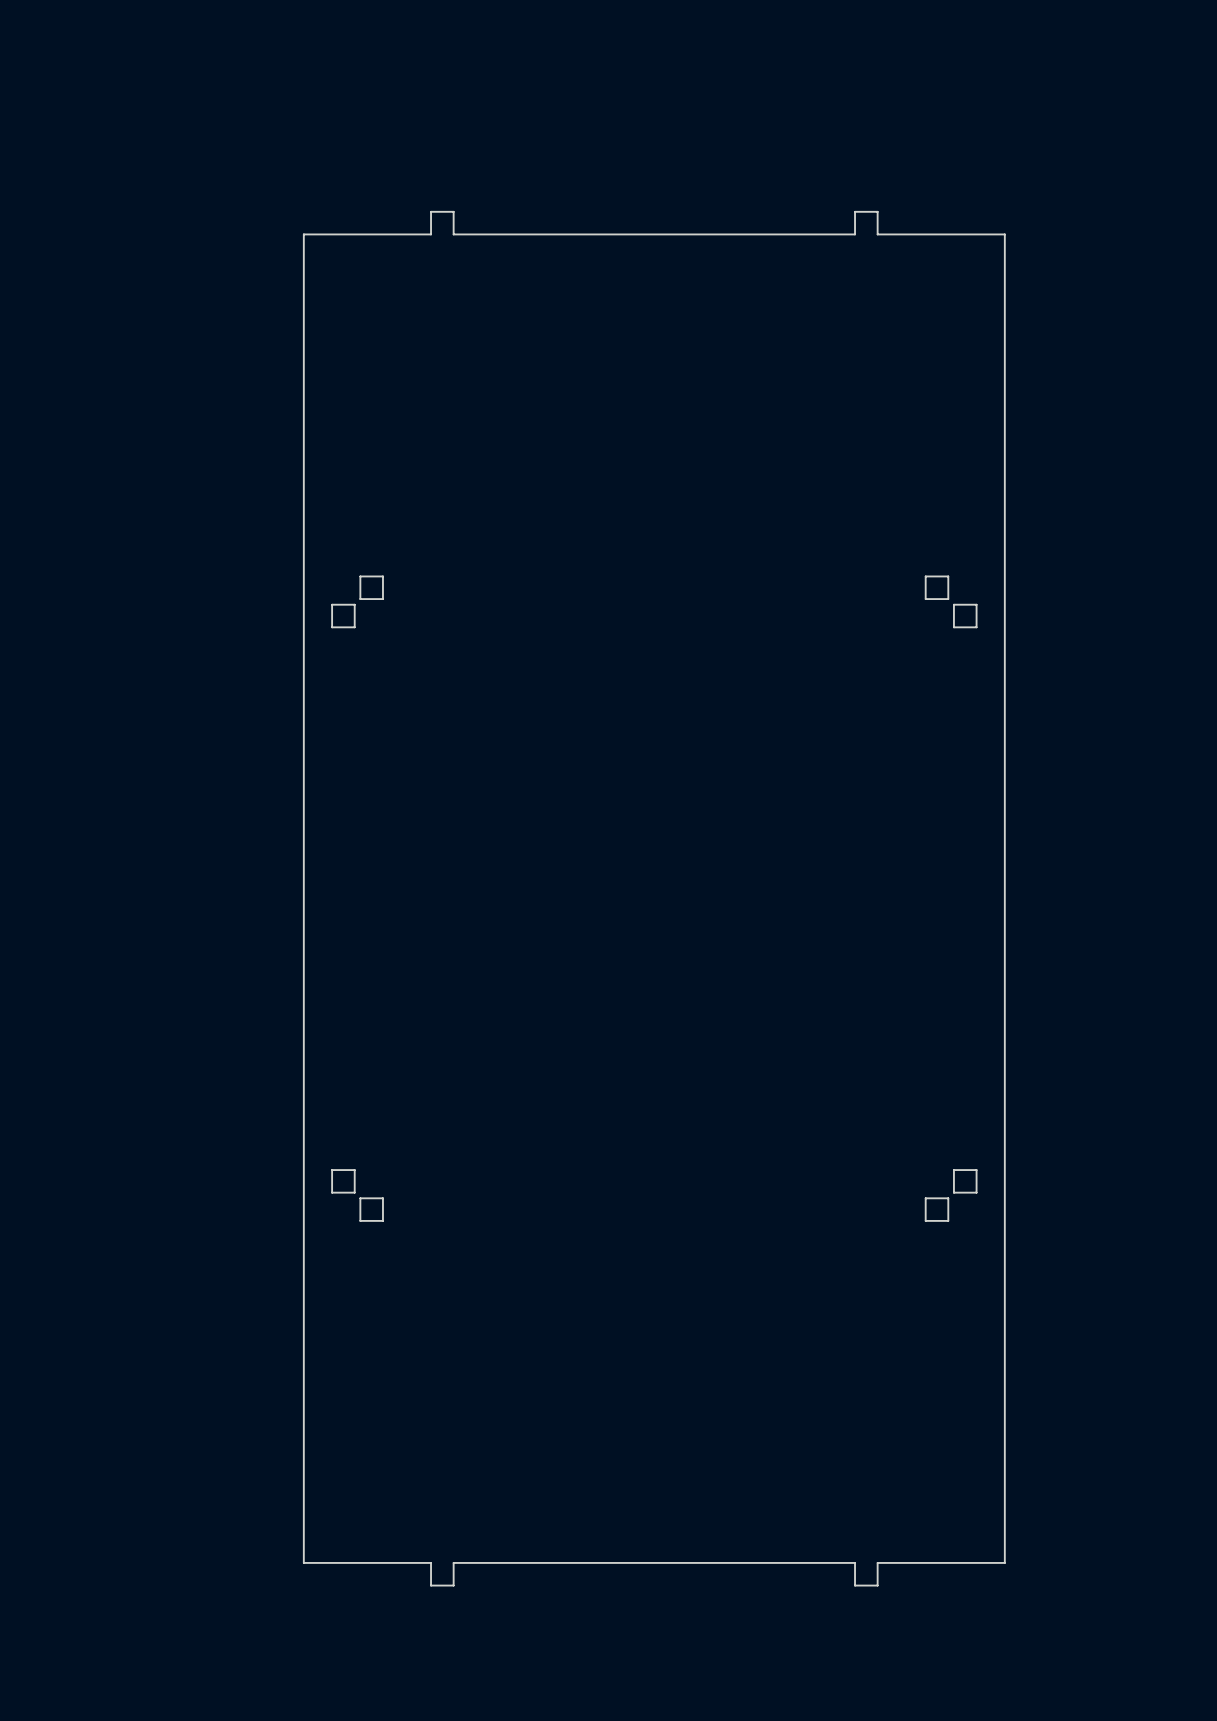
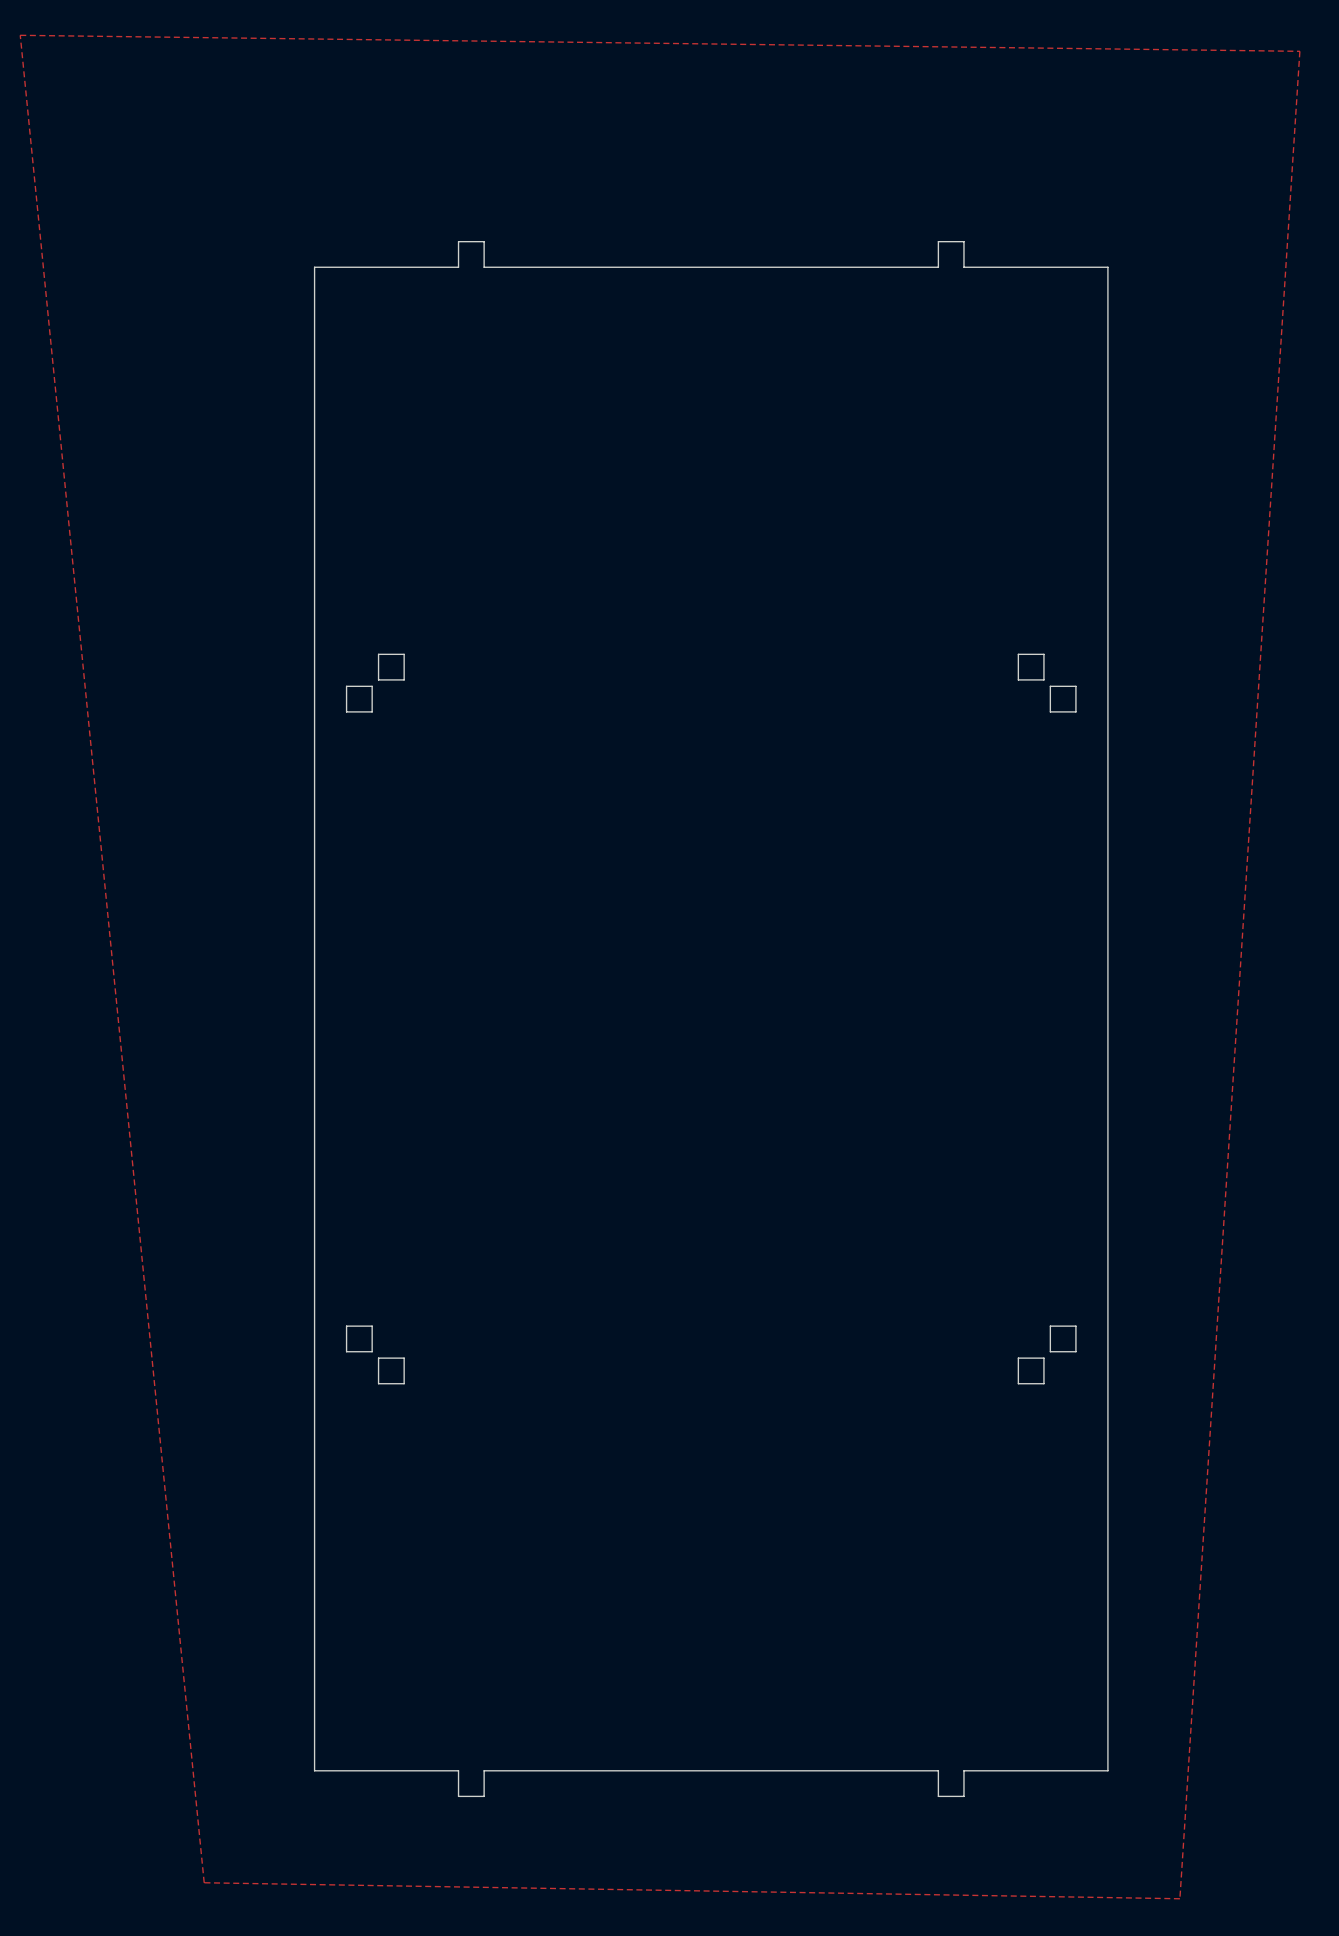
zone outline: none -> (20, 35) (204, 1882) (1179, 1898) (1299, 51) (20, 35)

